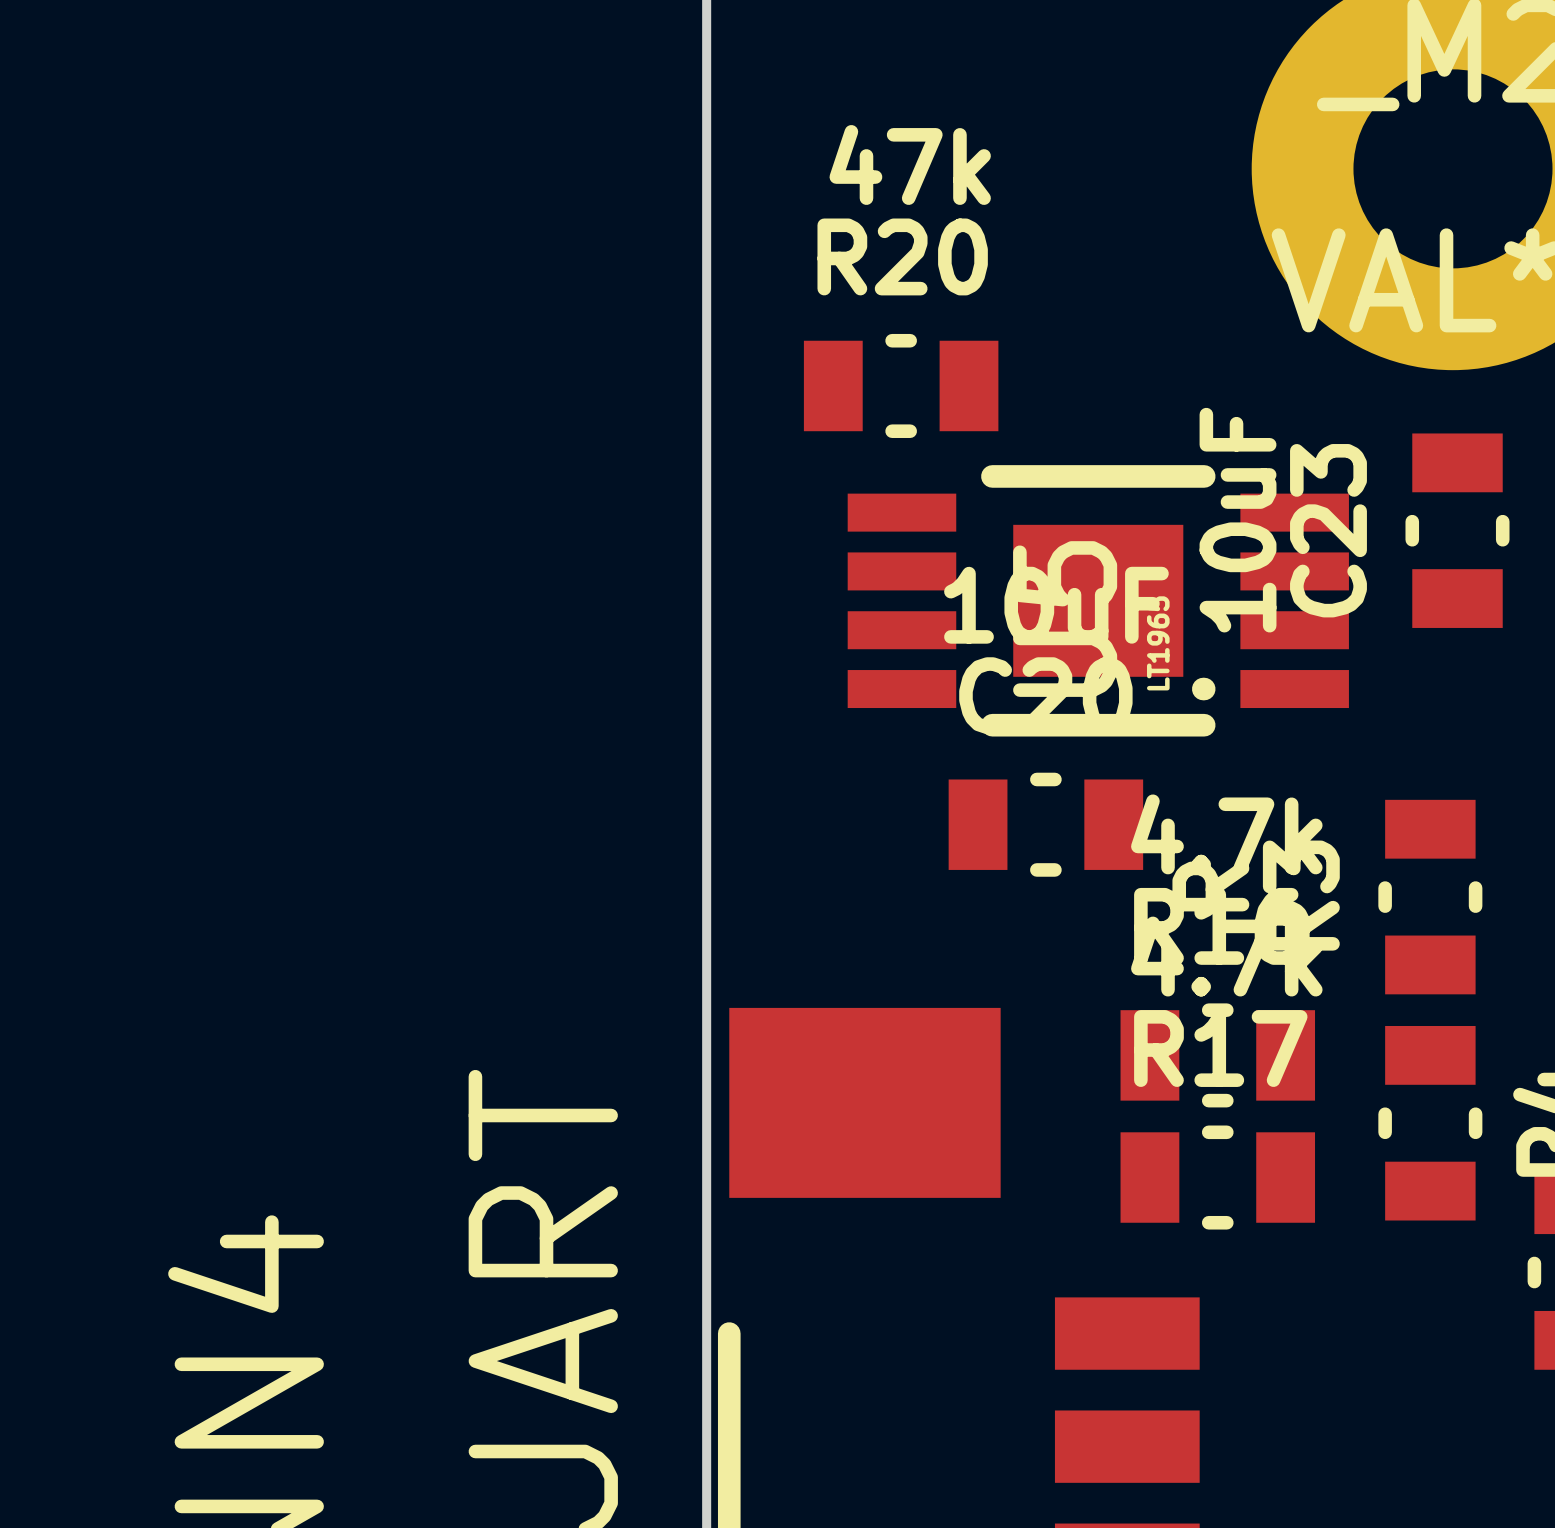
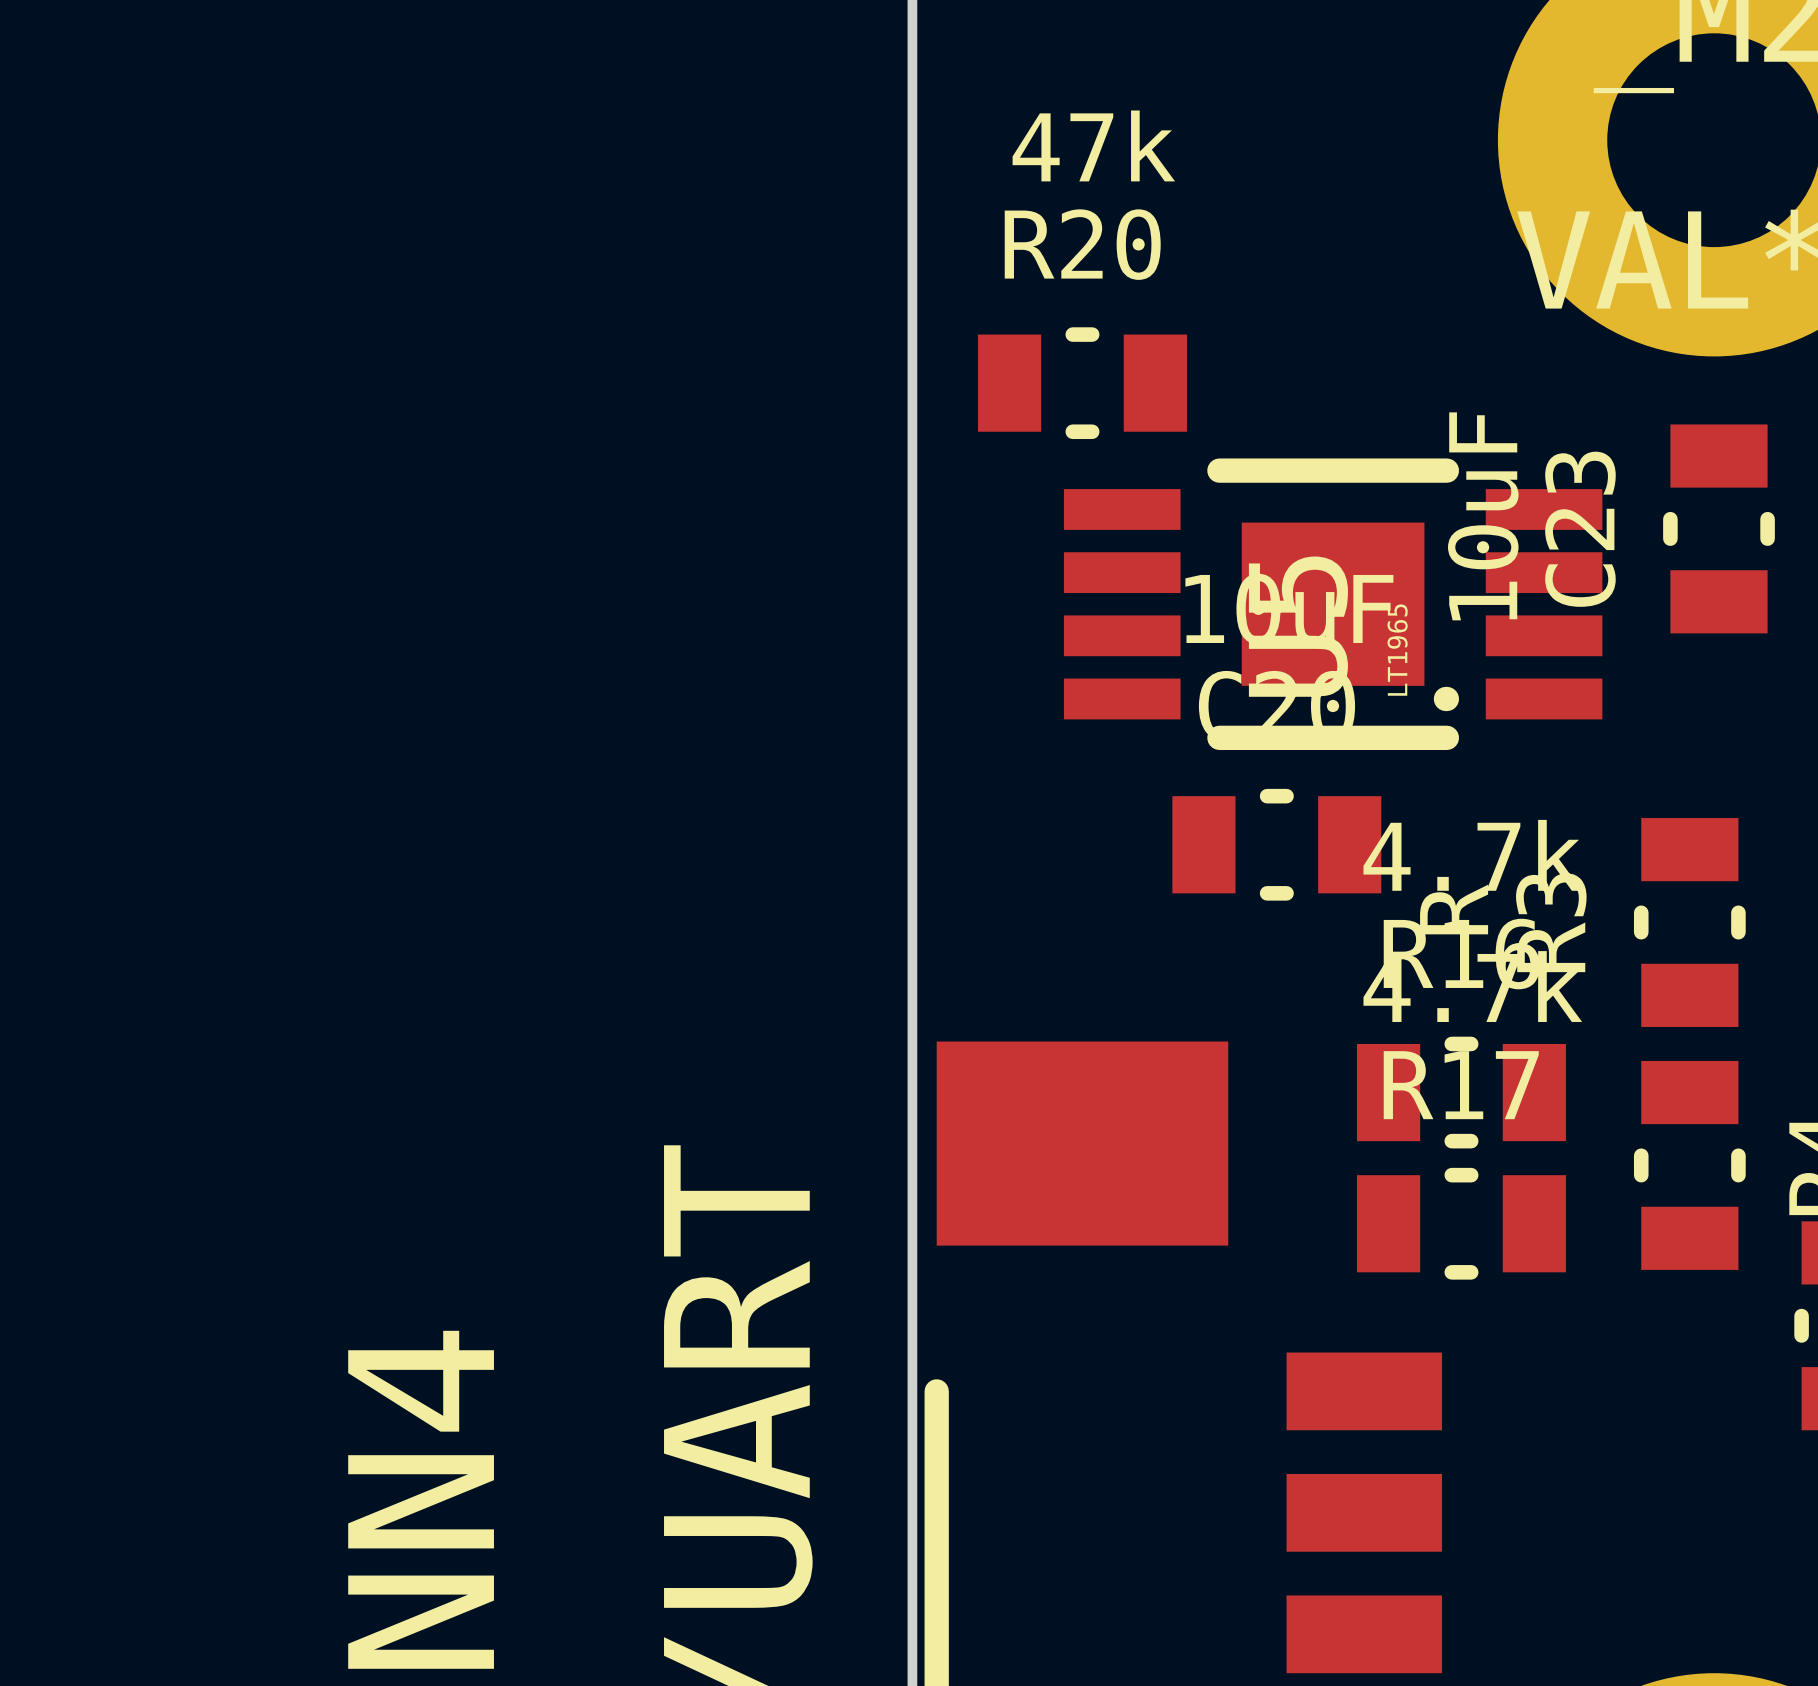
R20 position: (901, 385) -> (1082, 383)

